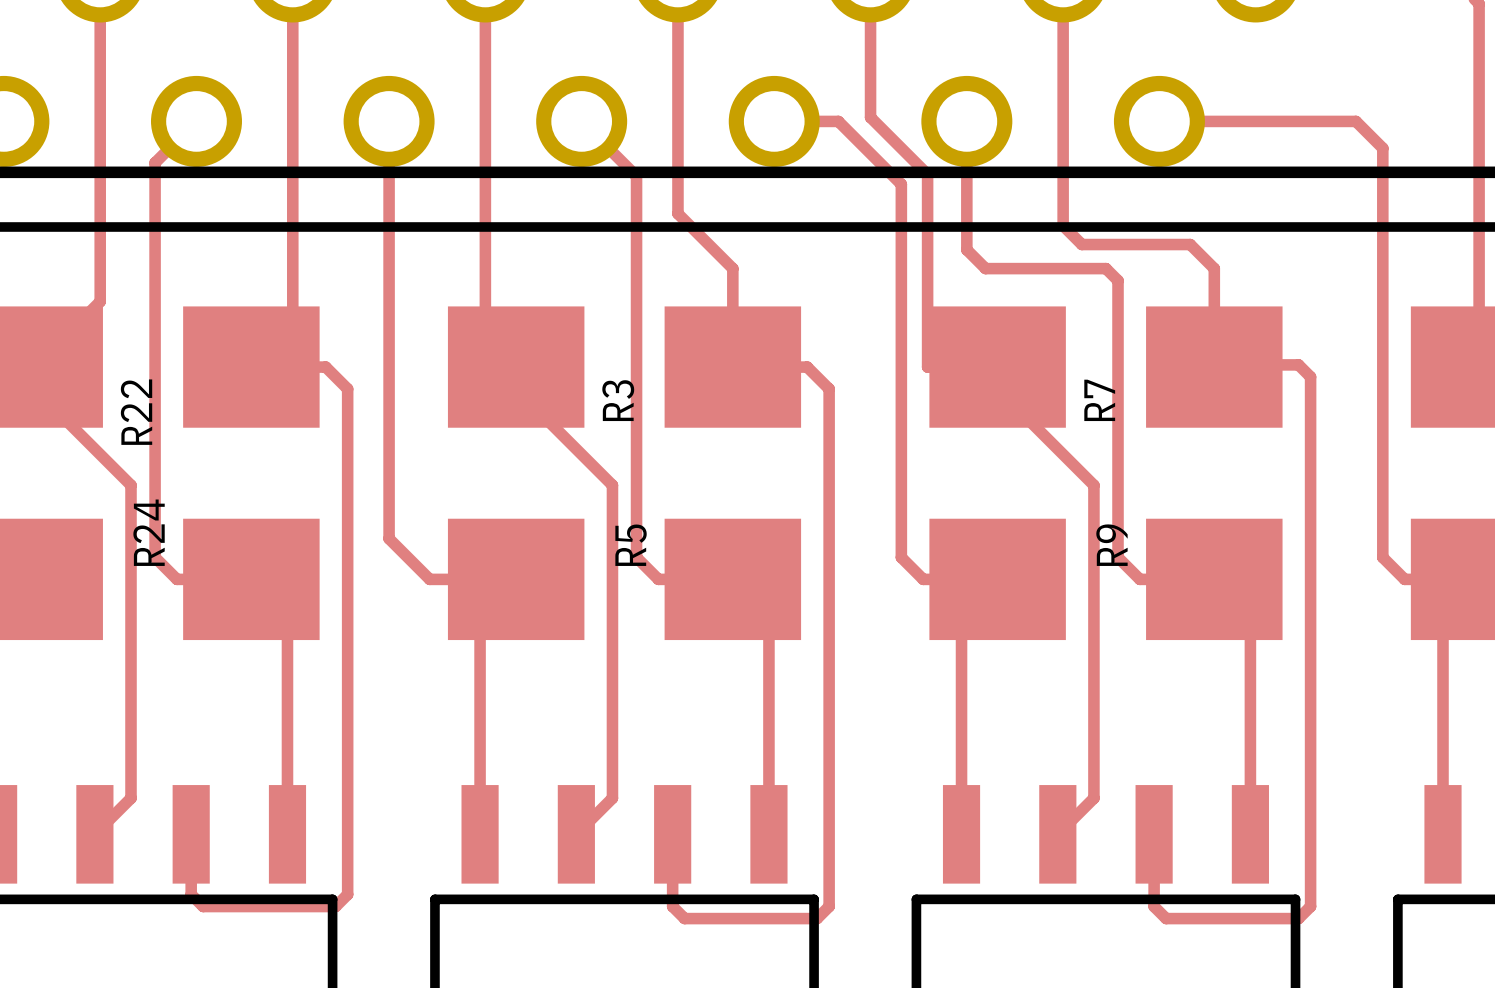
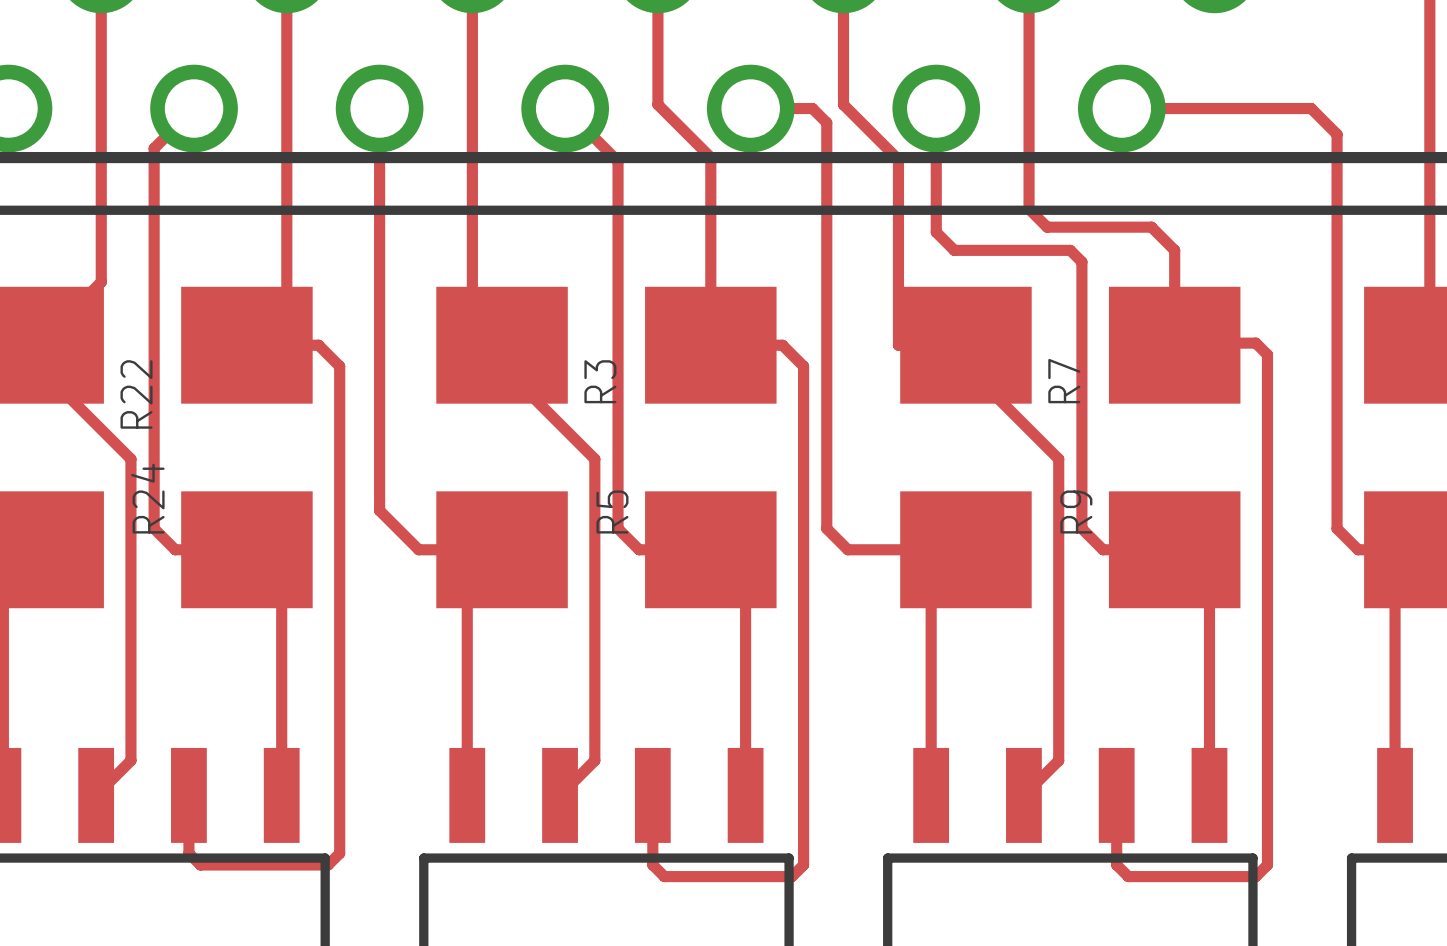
track: (677, 117) (677, 213) (732, 268) -> (657, 104) (710, 157) (710, 250)
track: (853, 136) (901, 184) (901, 557) (923, 579) -> (826, 122) (826, 528) (847, 549) (894, 549)

